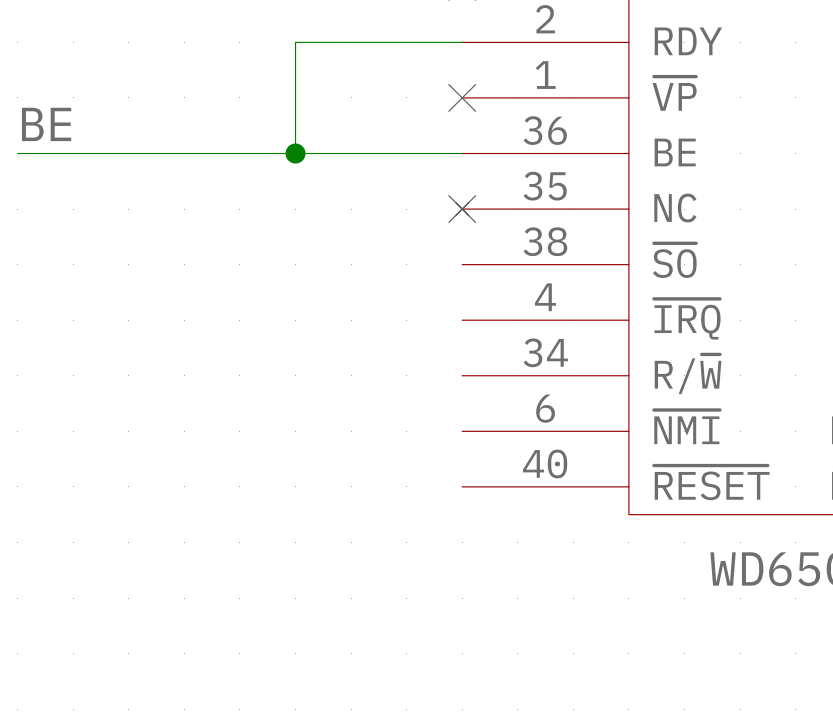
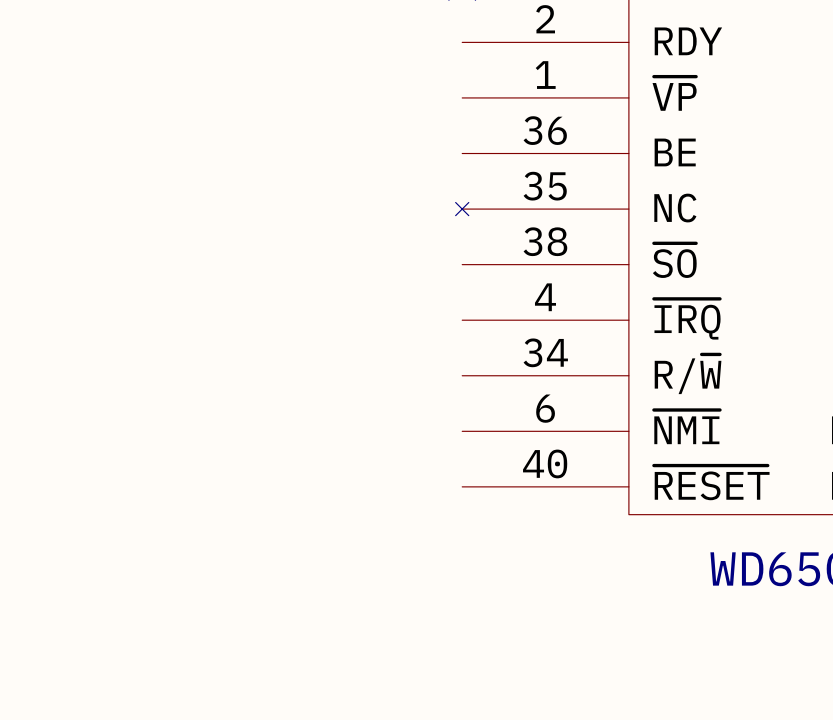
wire: (462, 42) (295, 42) (295, 153) -> none
no-connect mark: (462, 97) -> none
label: BE (46, 124) -> none
wire: (17, 153) (462, 153) -> none
junction: (295, 153) -> none
no-connect mark: (462, 209) -> none

